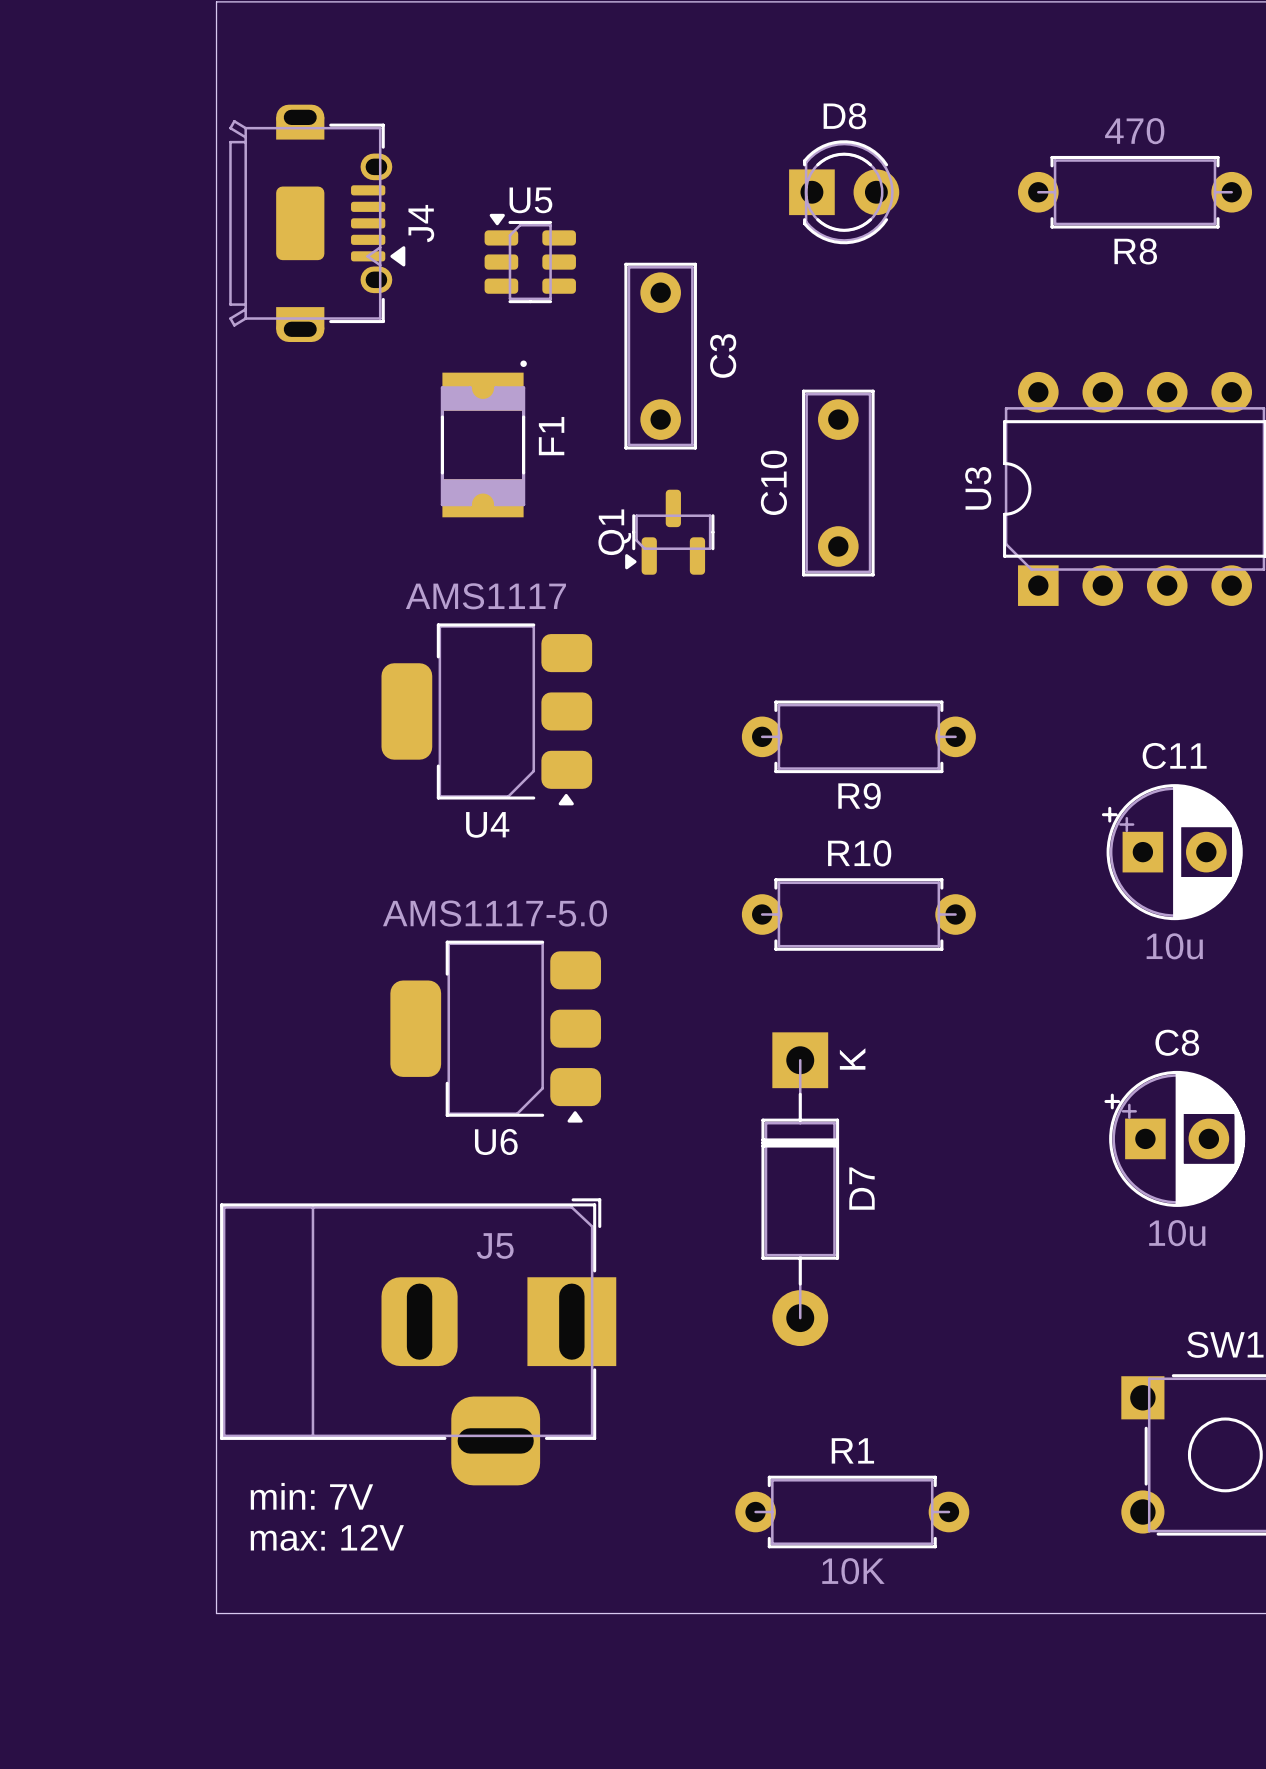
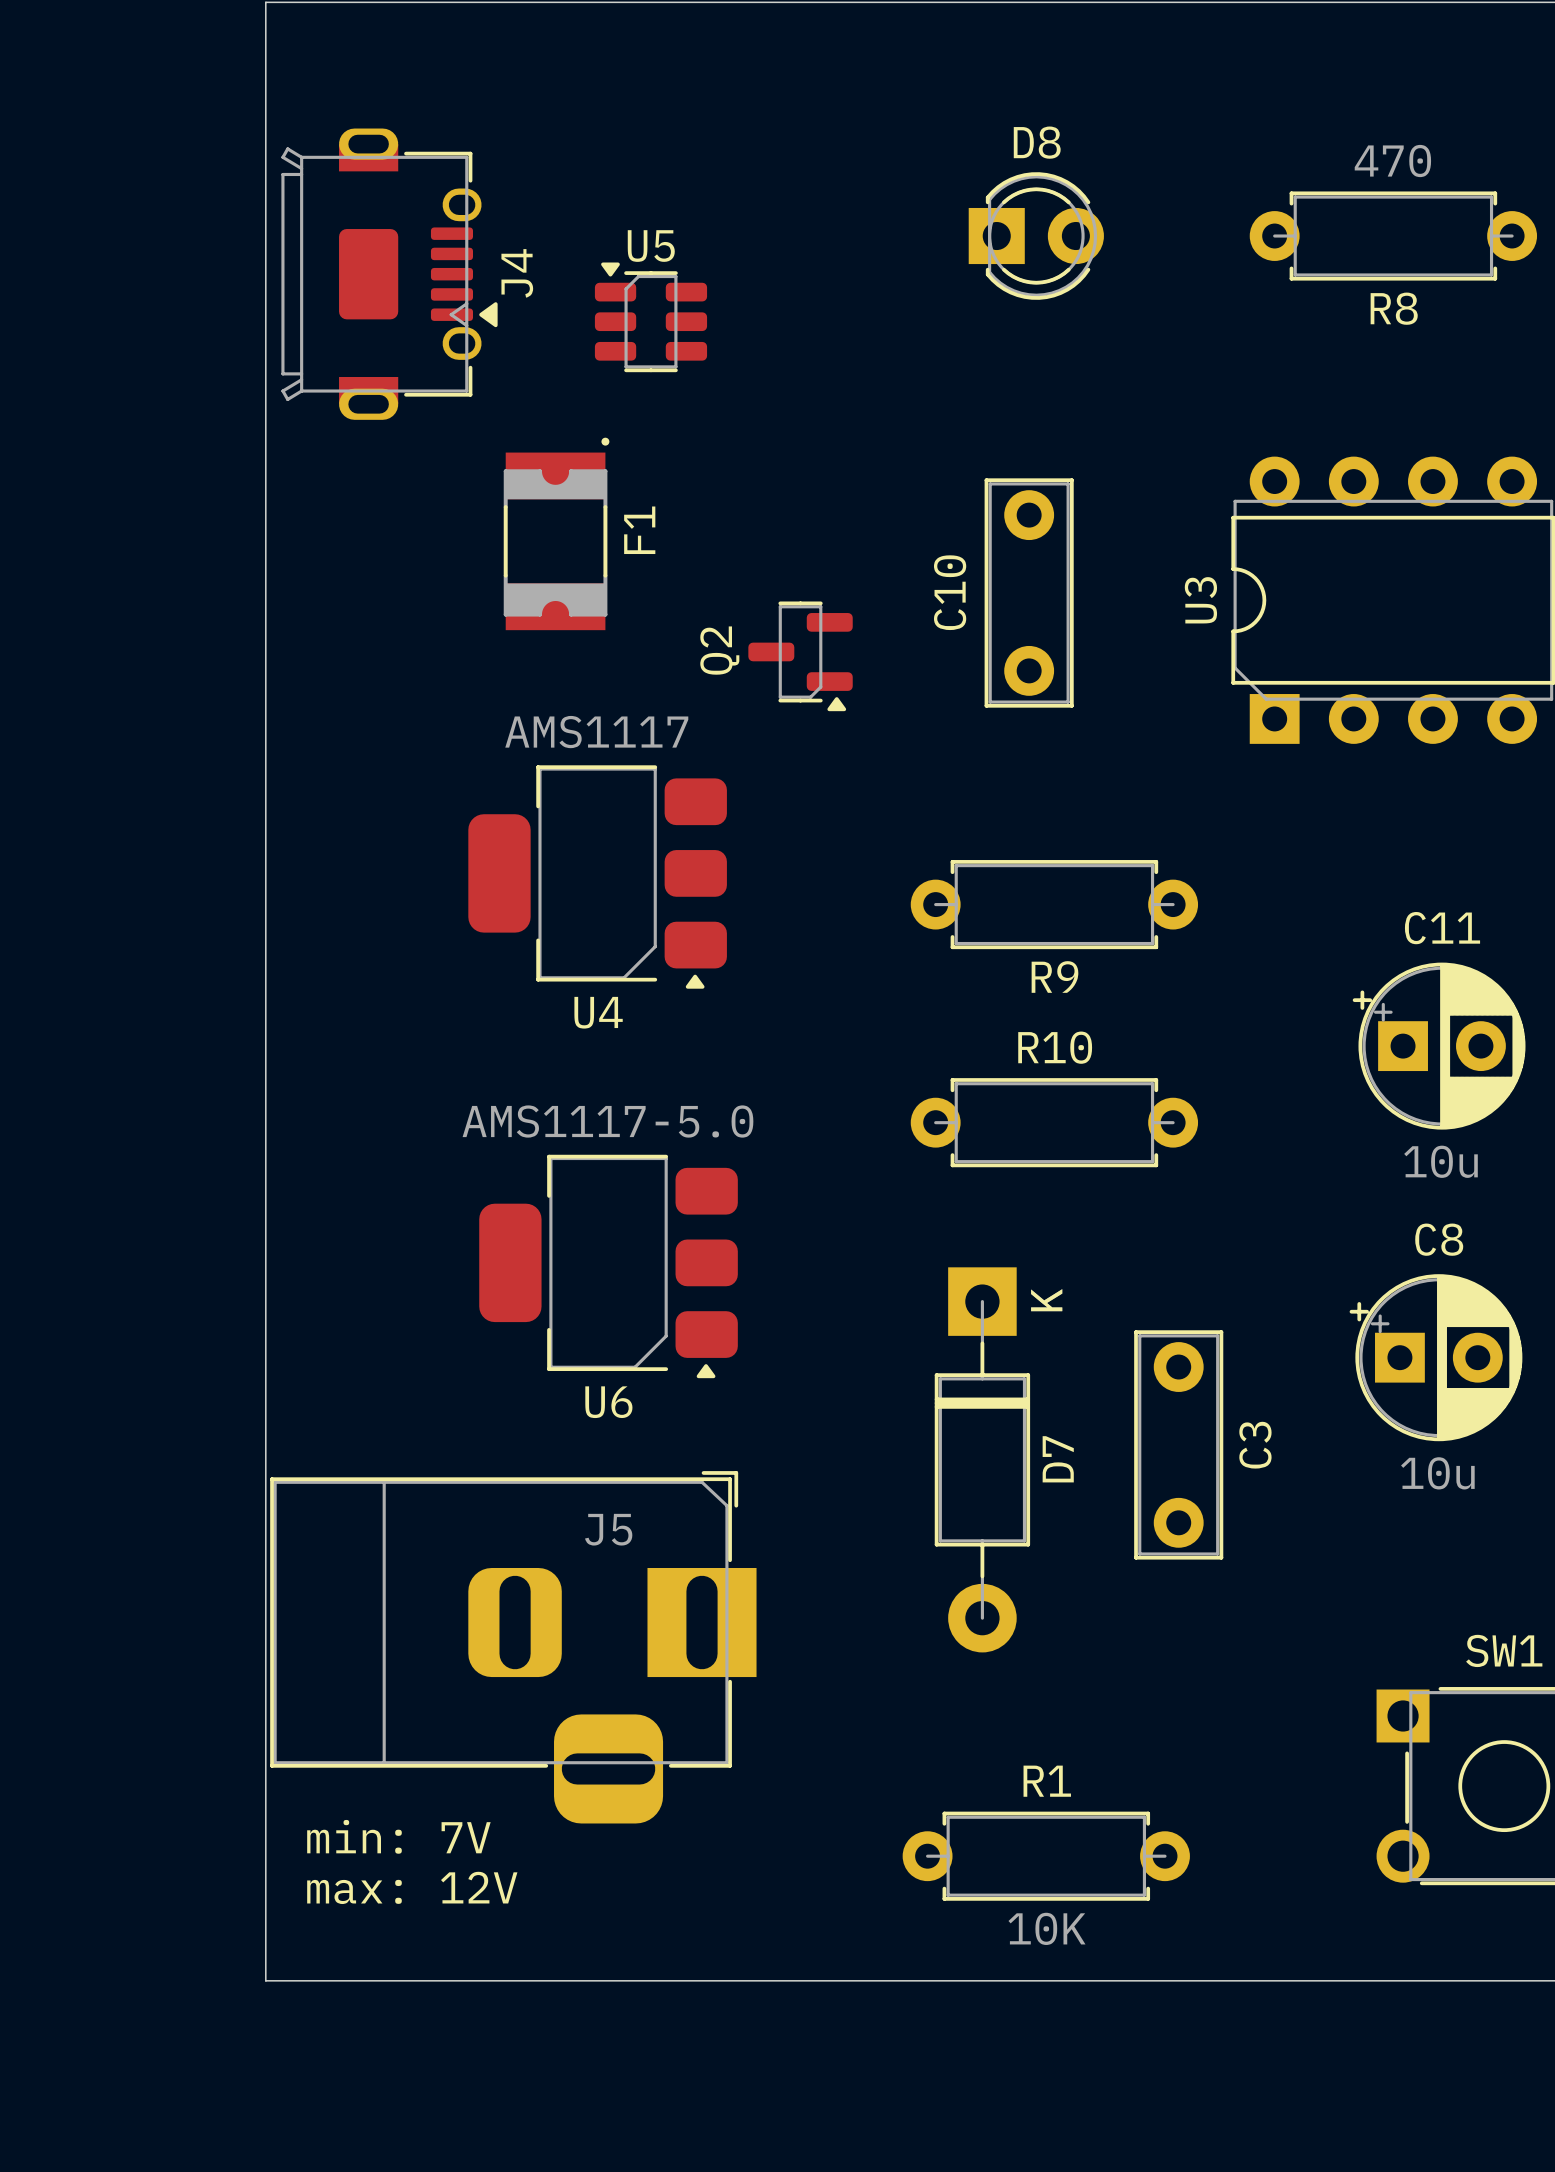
C3 position: (660, 356) -> (1178, 1444)
F1 footprint: [440, 360, 527, 518] -> [503, 437, 610, 631]
Q1: (669, 532) -> none
Q2: none -> (800, 656)
C8 position: (1174, 1138) -> (1436, 1357)

